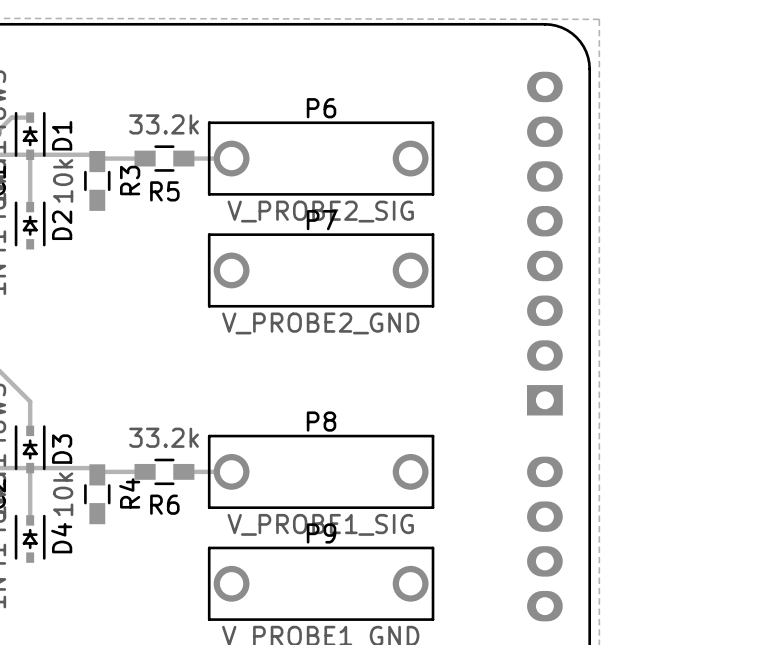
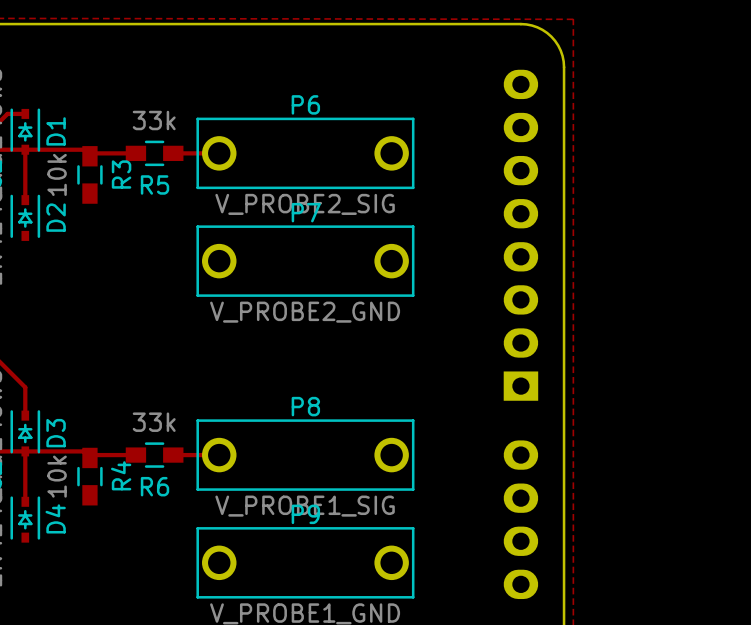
R5 value: 33.2k (164, 124) -> 33k (154, 120)
R6 value: 33.2k (164, 437) -> 33k (154, 422)

